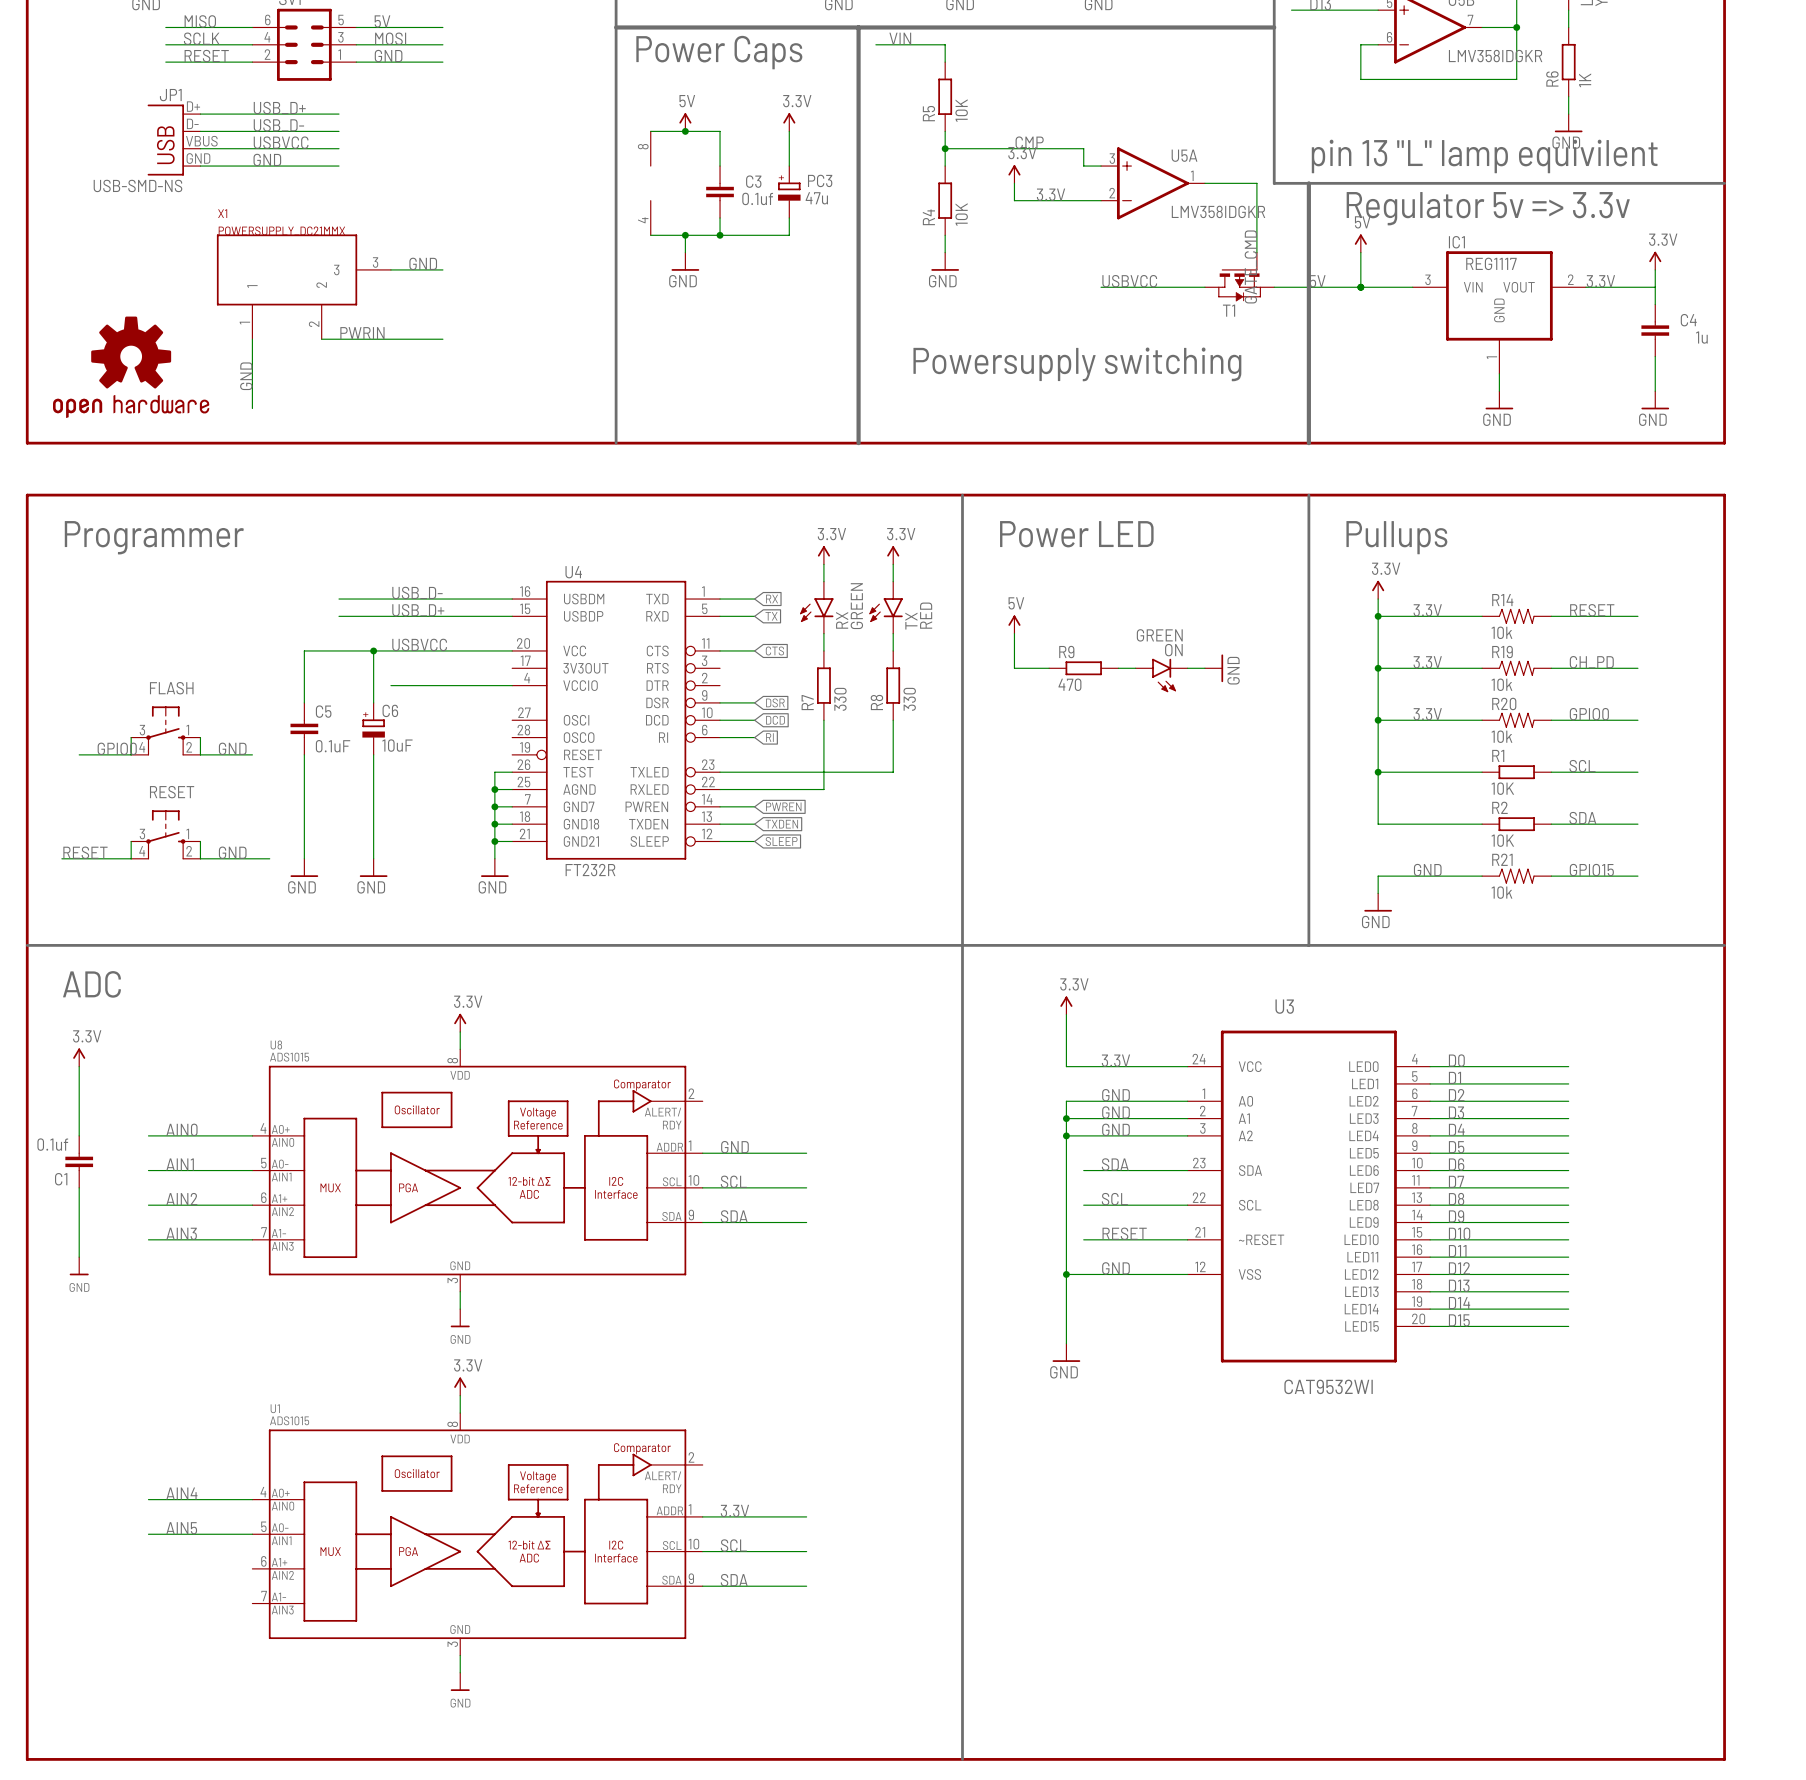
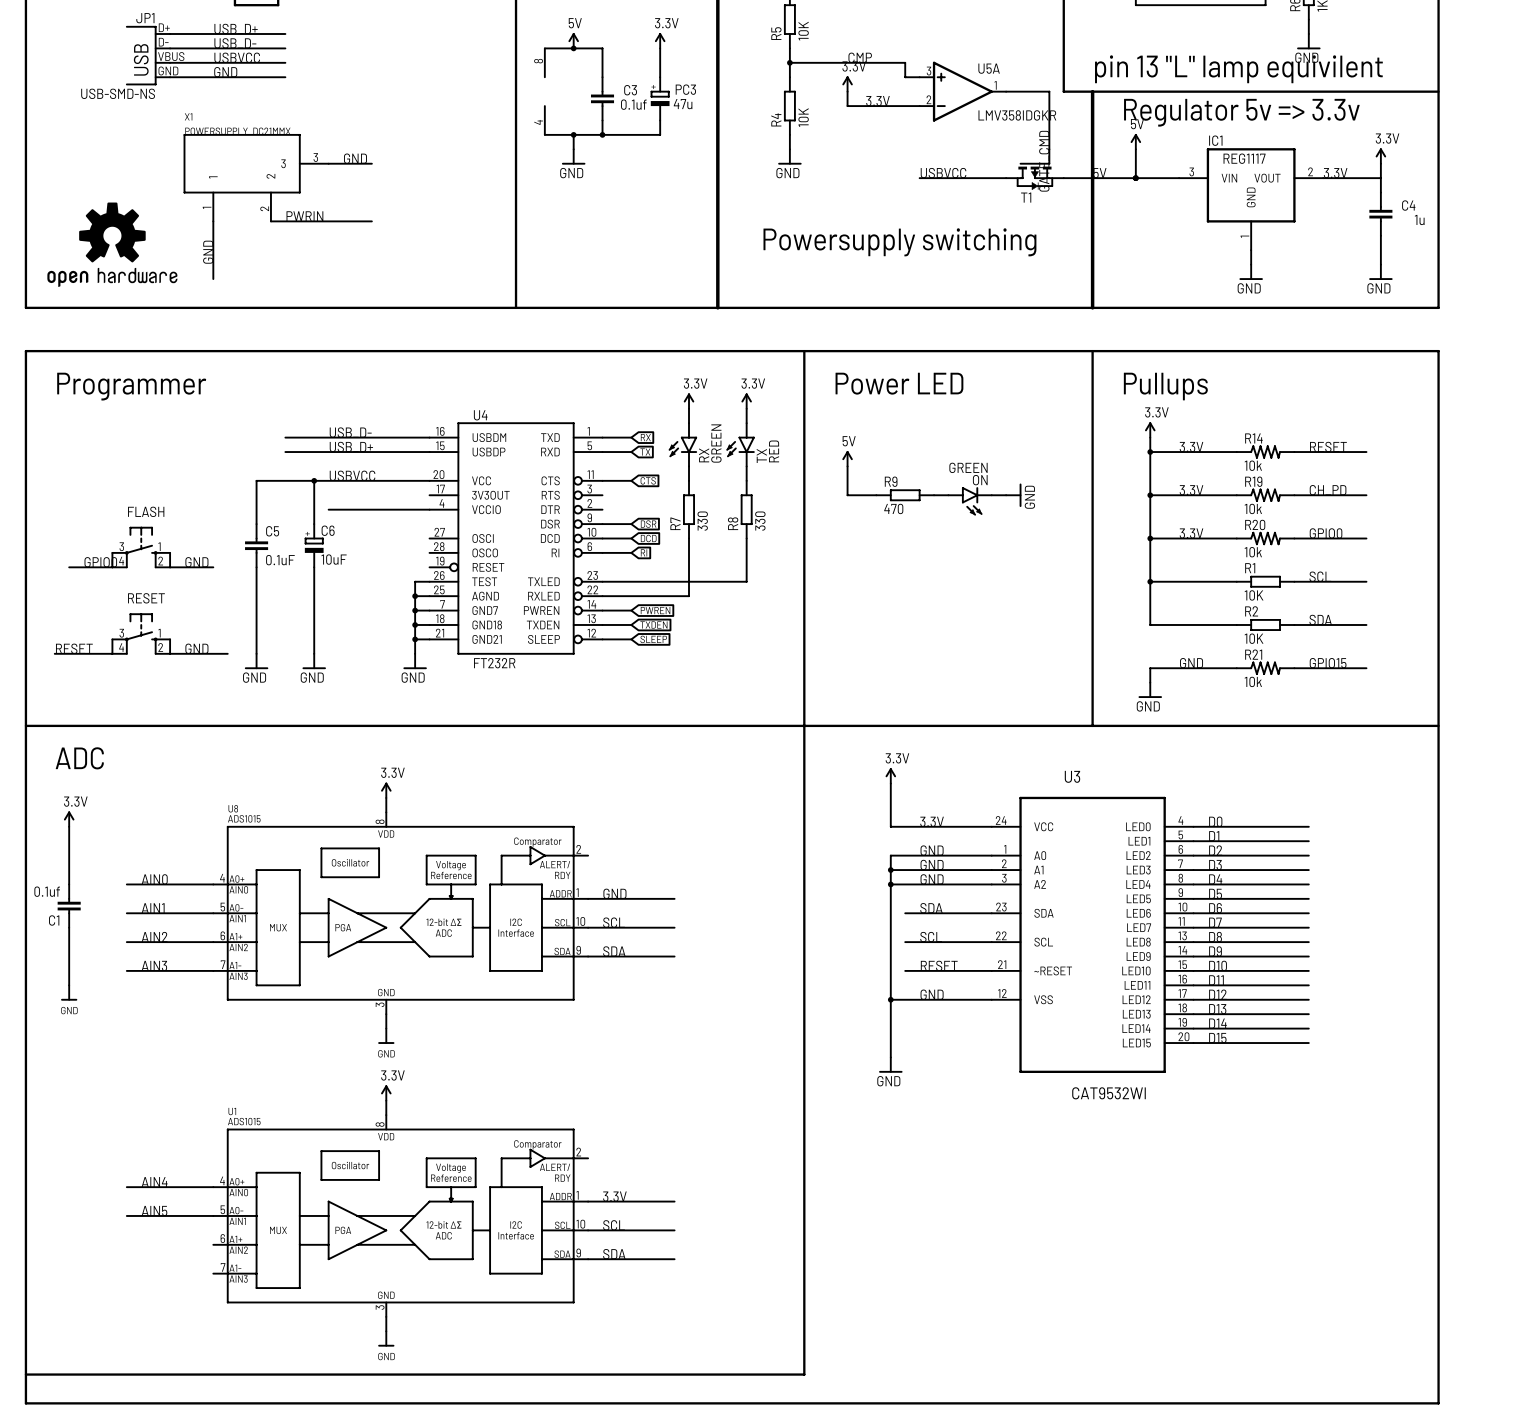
line: (962, 1724) (962, 1759) -> (804, 1374) (25, 1374)

